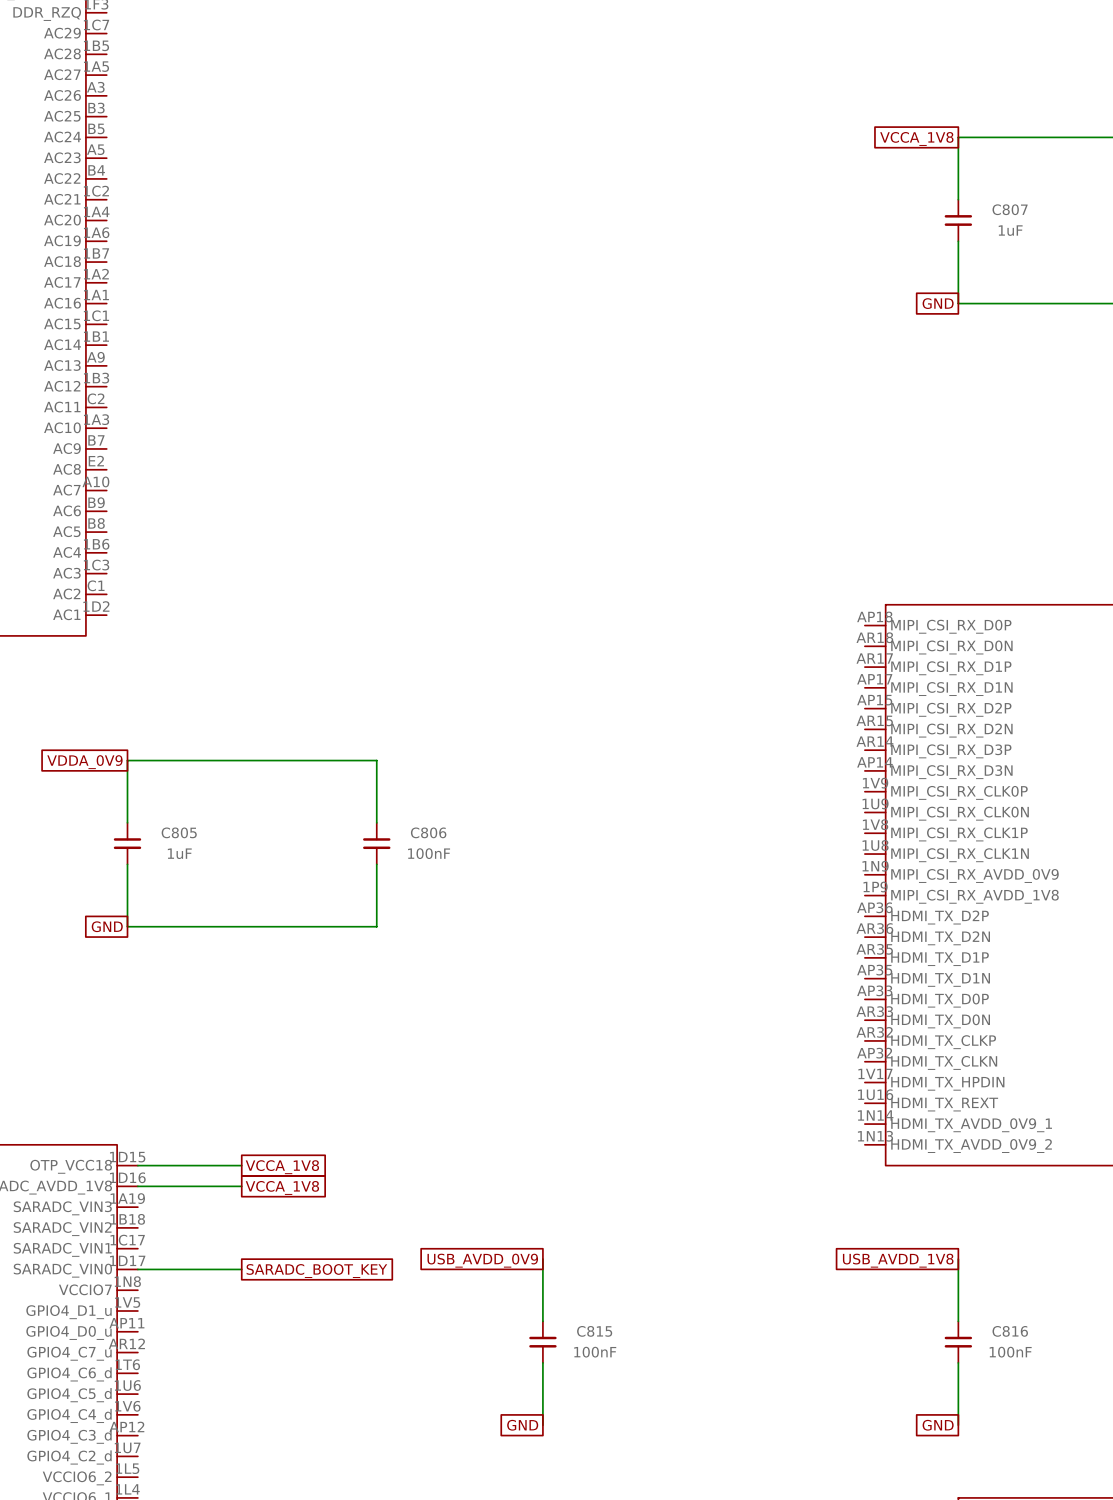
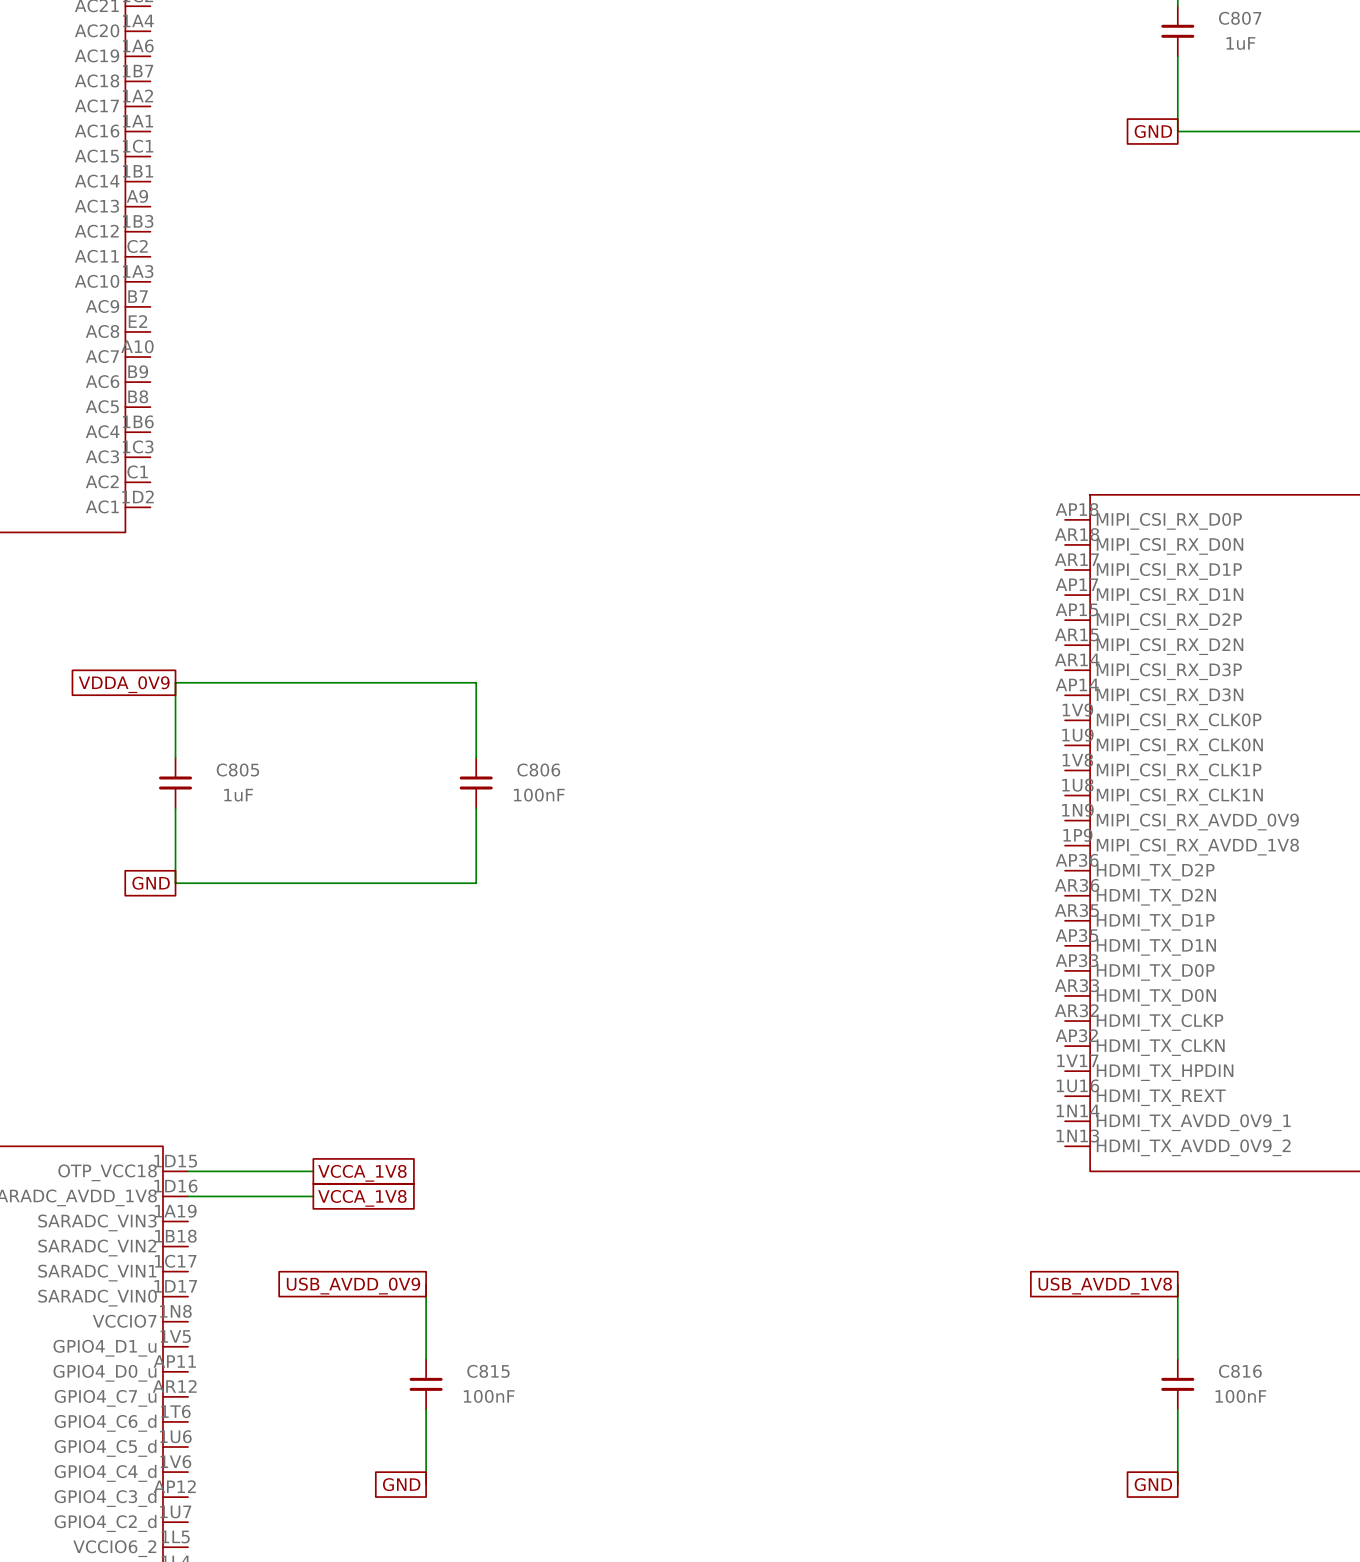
wire: none -> (426, 1284) (426, 1359)
wire: (542, 1259) (542, 1321) -> none
global label: none -> USB_AVDD_0V9 (353, 1286)
global label: USB_AVDD_0V9 (482, 1260) -> none
wire: (137, 1269) (241, 1269) -> none
global label: SARADC_BOOT_KEY (316, 1271) -> none
C815 position: (542, 1342) -> (426, 1384)
wire: none -> (426, 1409) (426, 1484)
wire: (542, 1362) (542, 1425) -> none
global label: none -> GND (401, 1484)
global label: GND (522, 1425) -> none

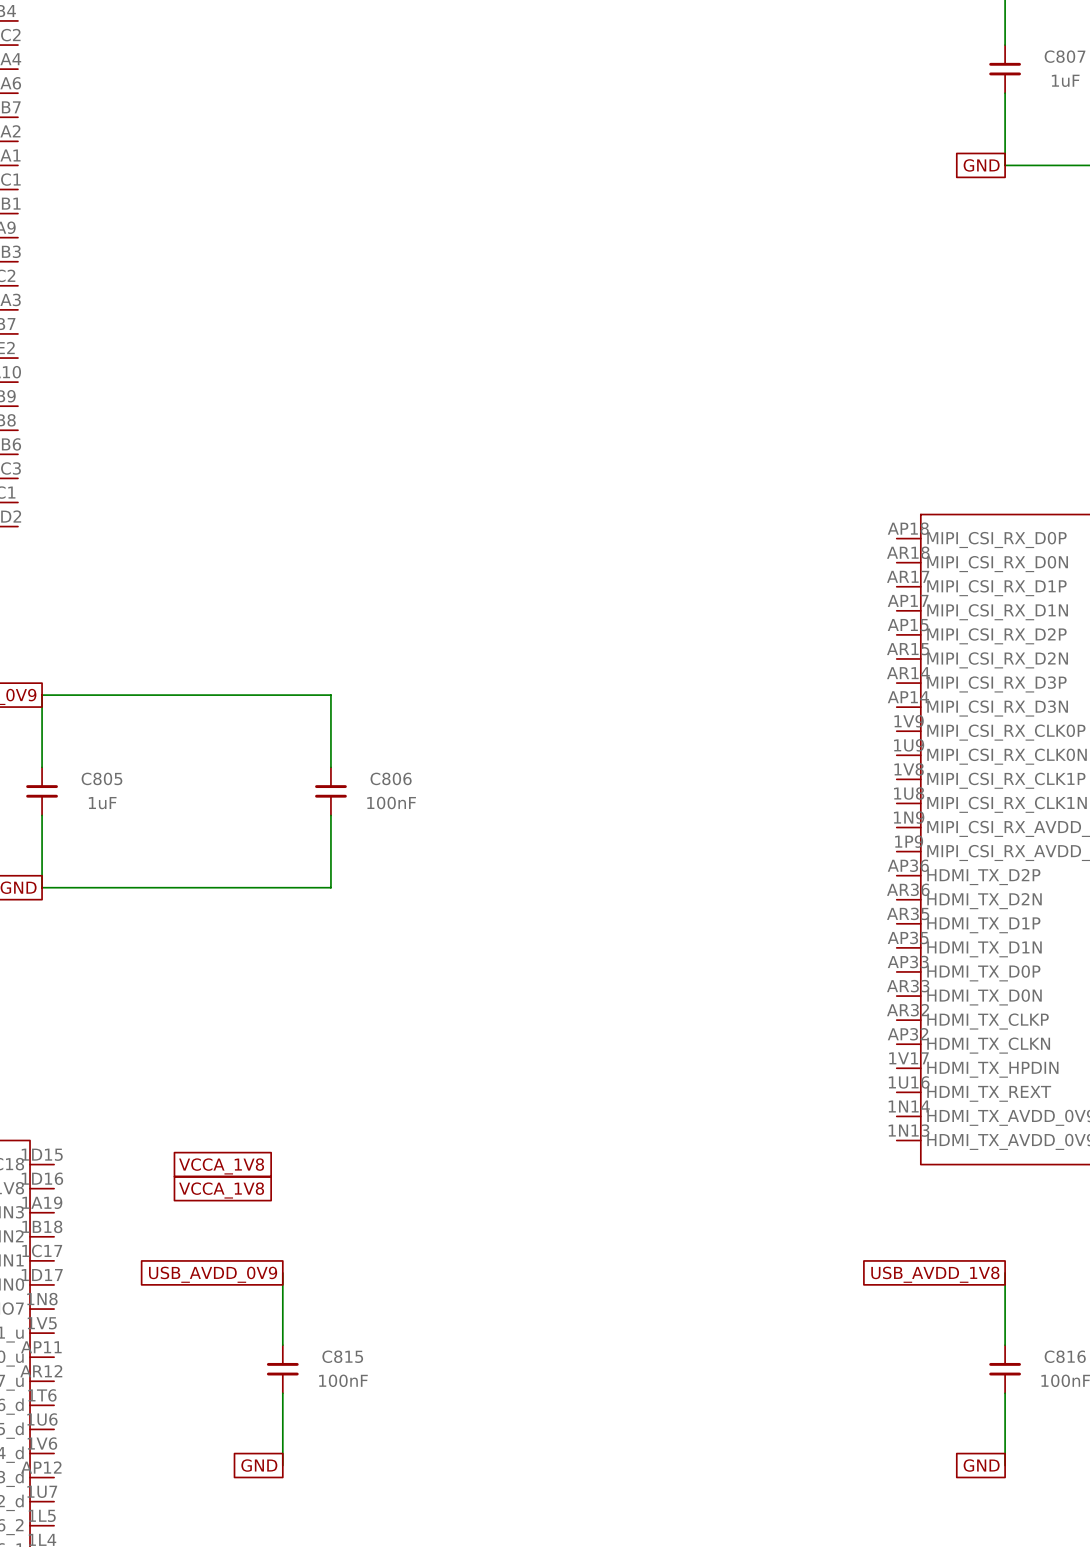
wire: (188, 1171) (313, 1171) -> none
wire: (188, 1196) (313, 1196) -> none

